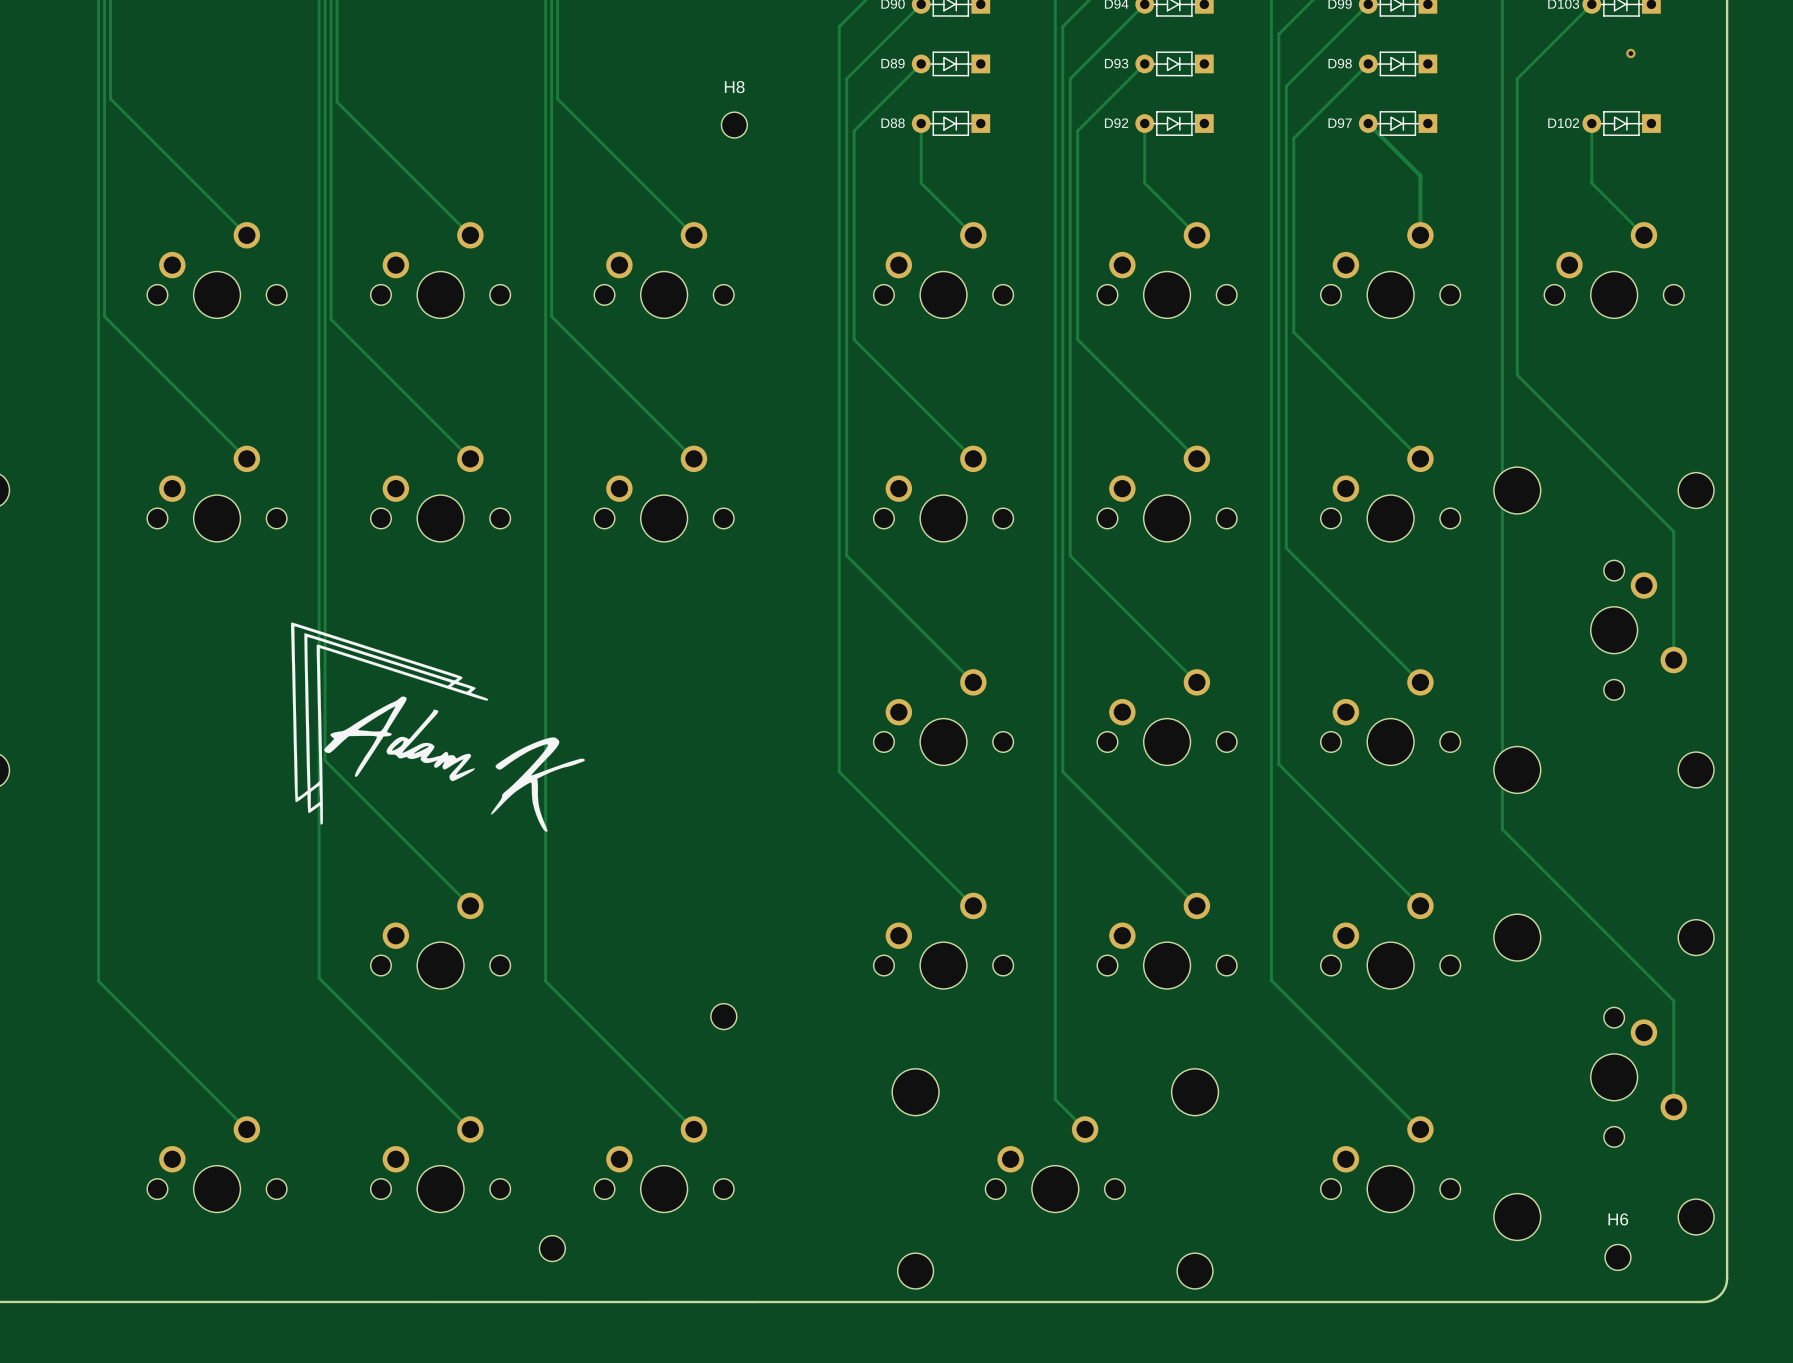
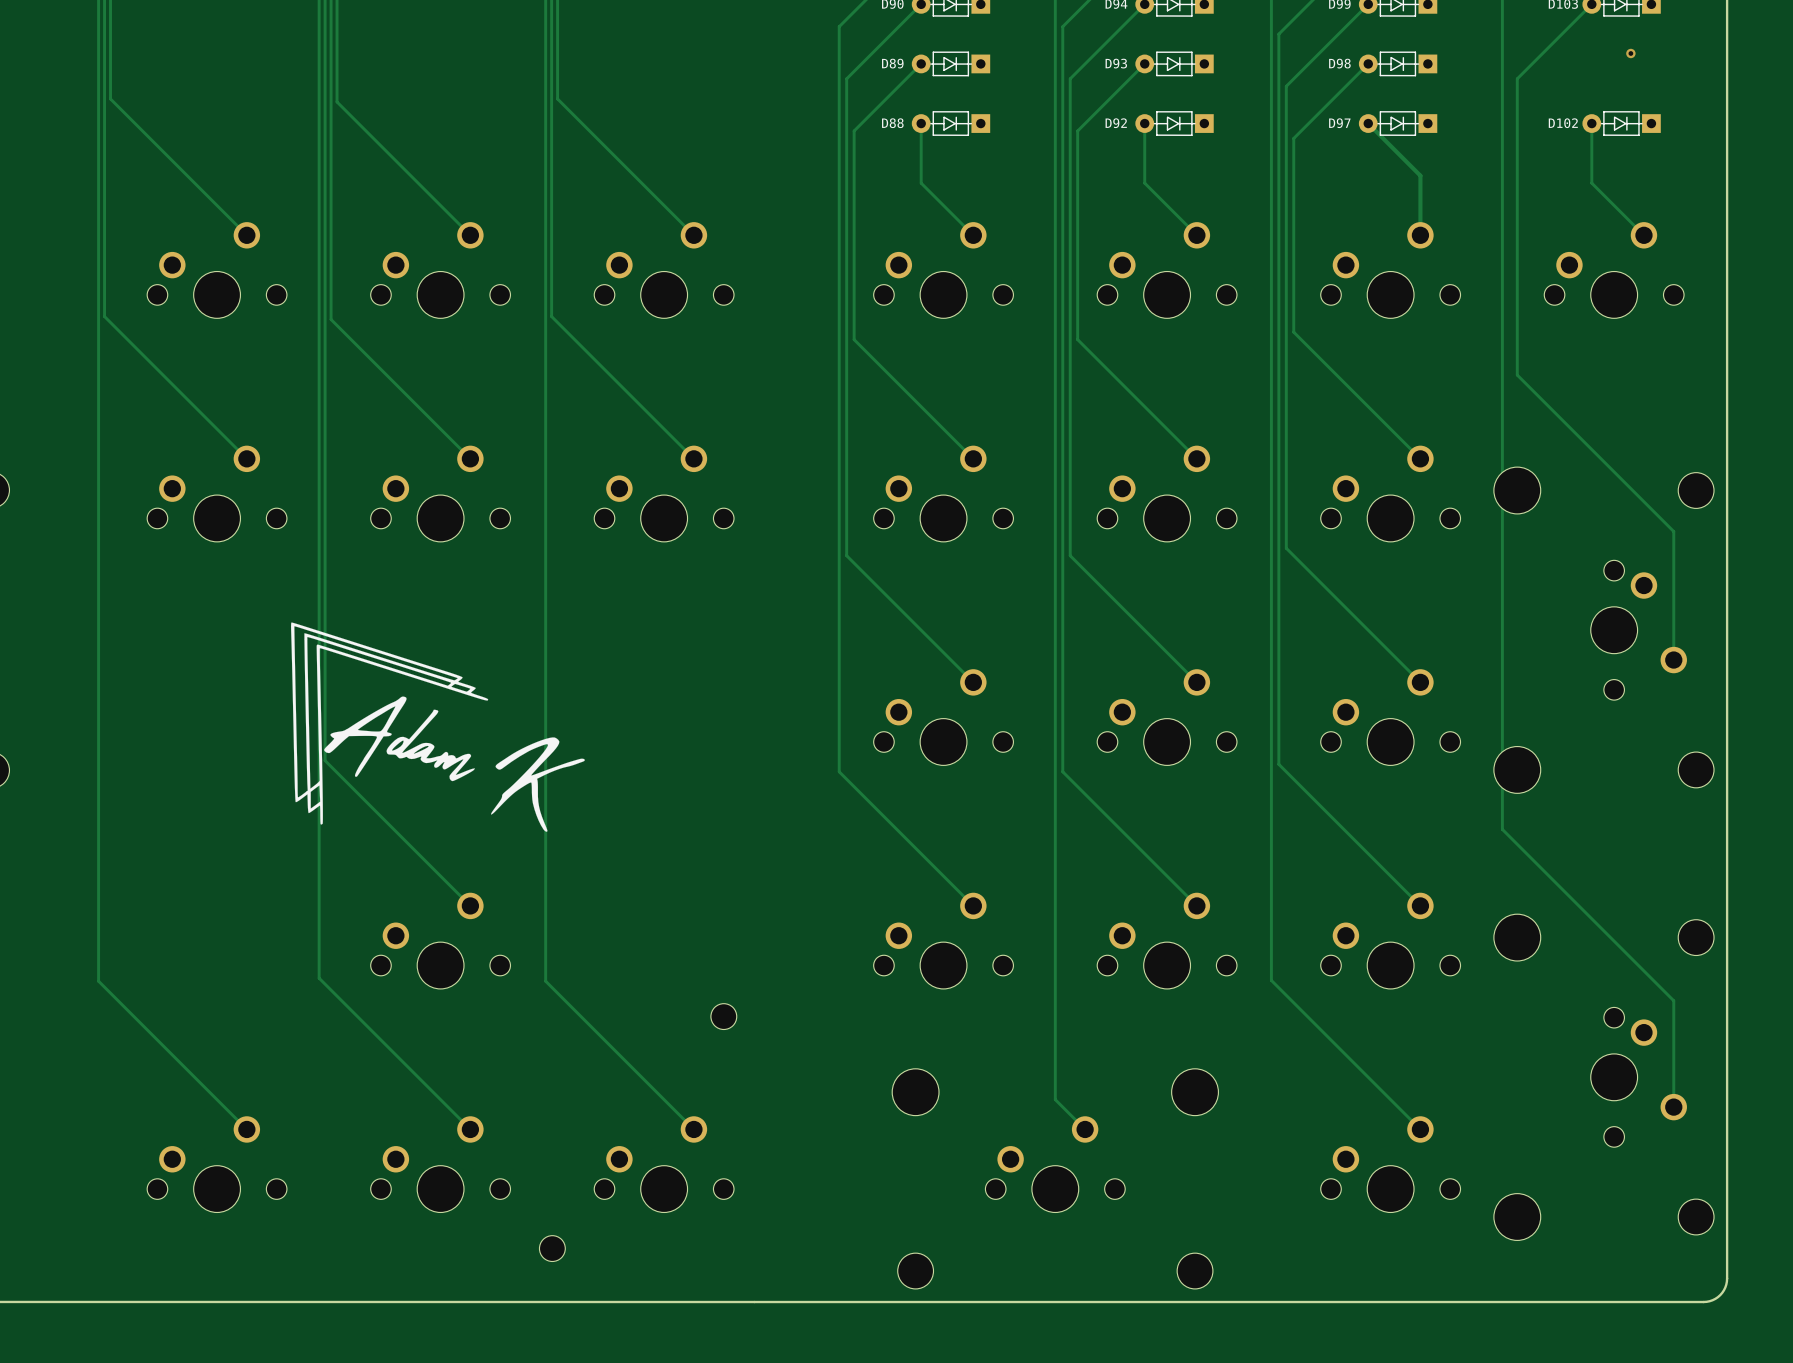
H8: (734, 125) -> none
H6: (1617, 1257) -> none

